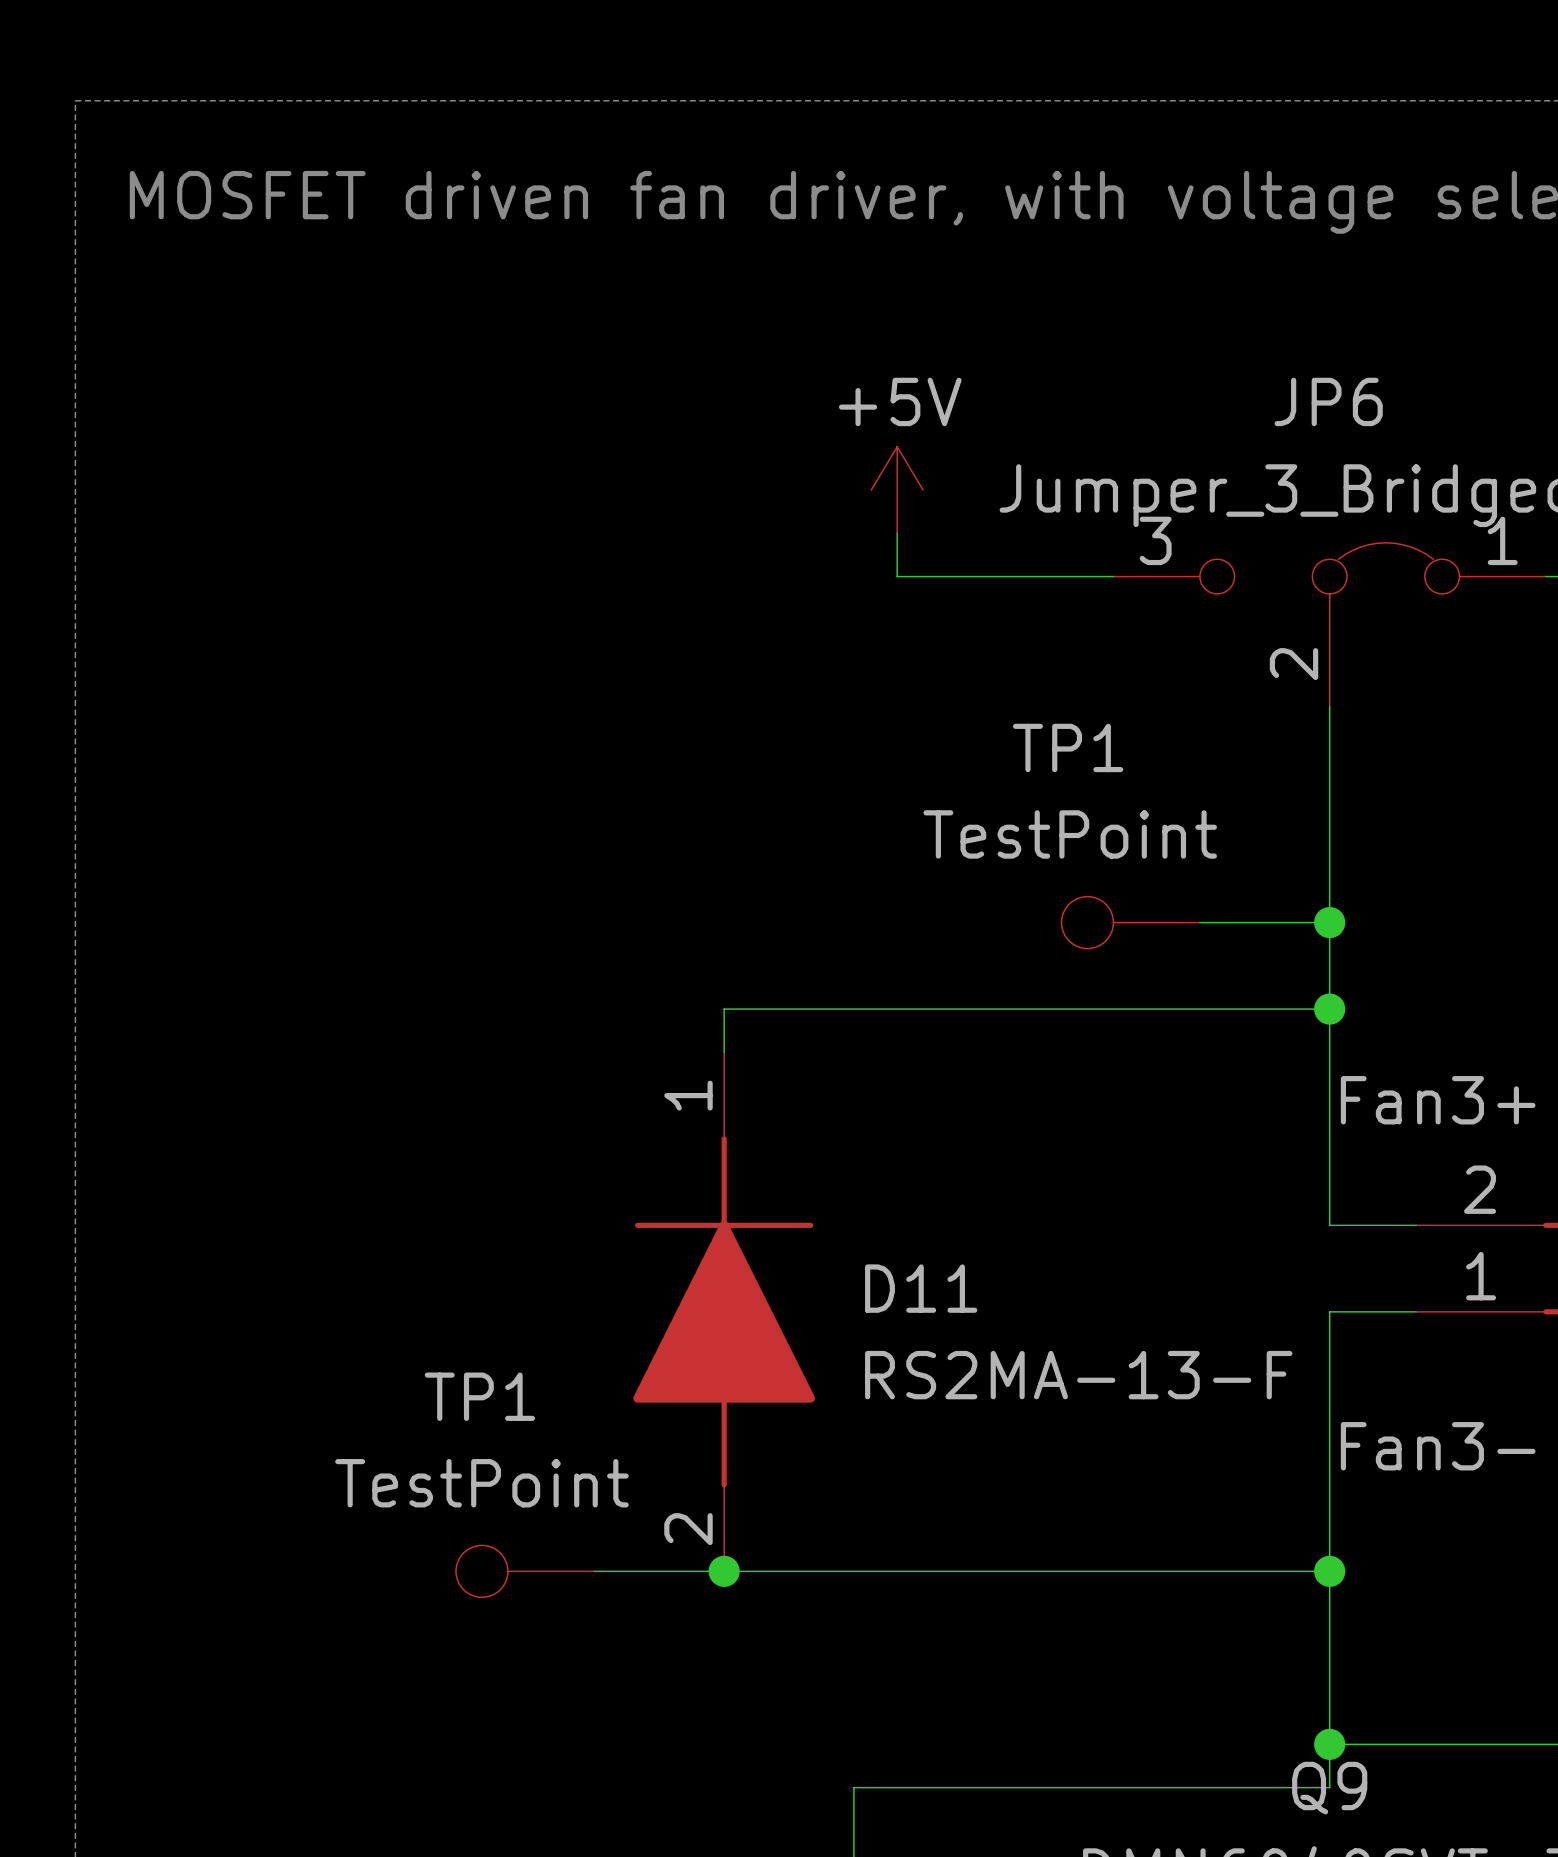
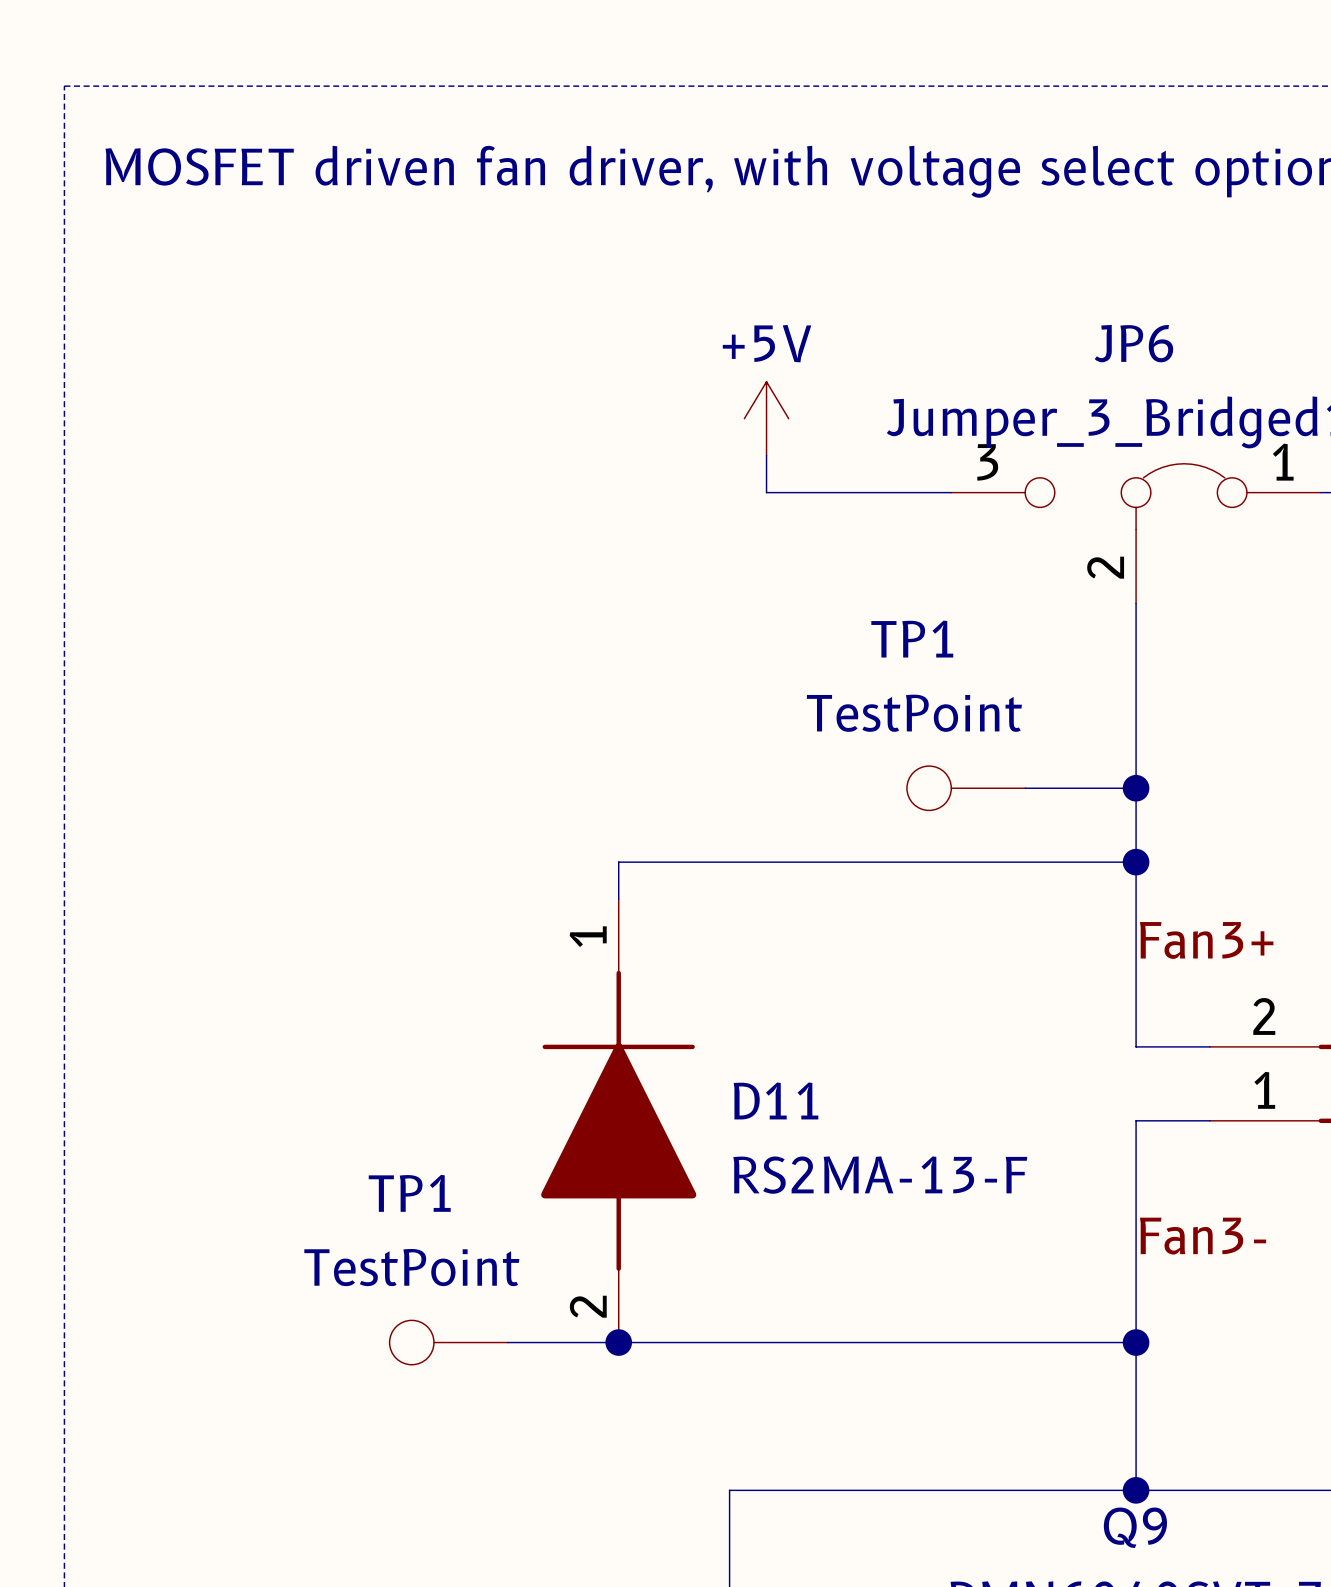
wire: (1329, 1744) (1329, 1787) (853, 1787) -> (1136, 1490) (729, 1490) (729, 1527)

